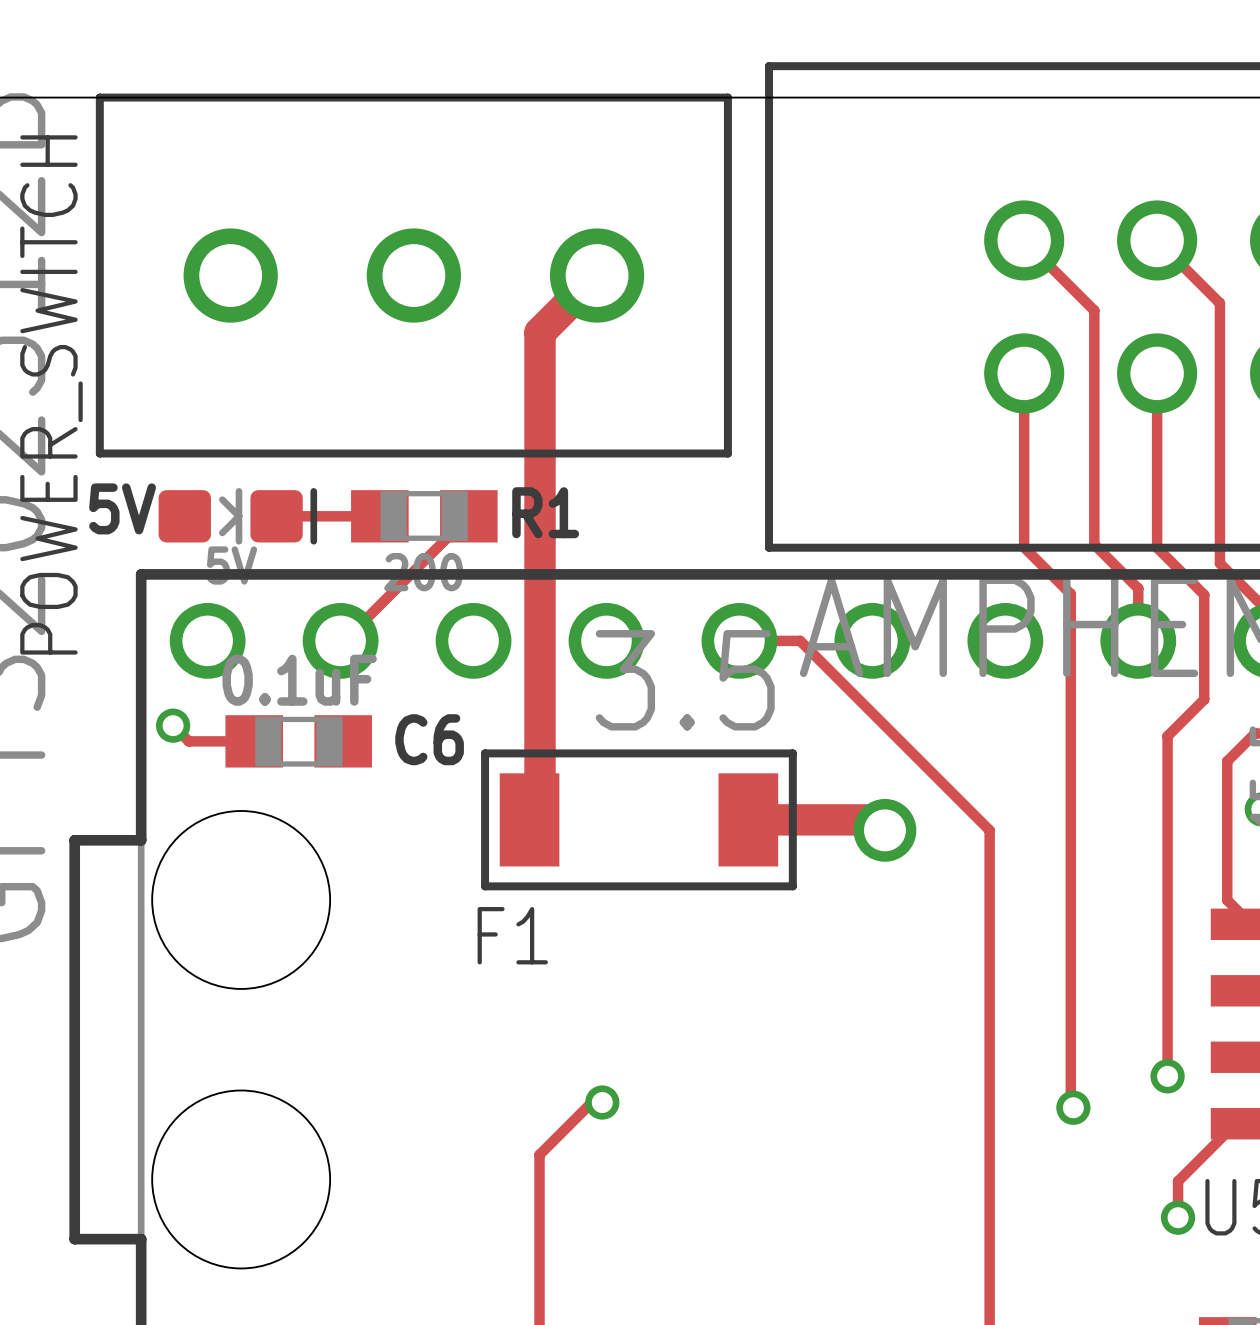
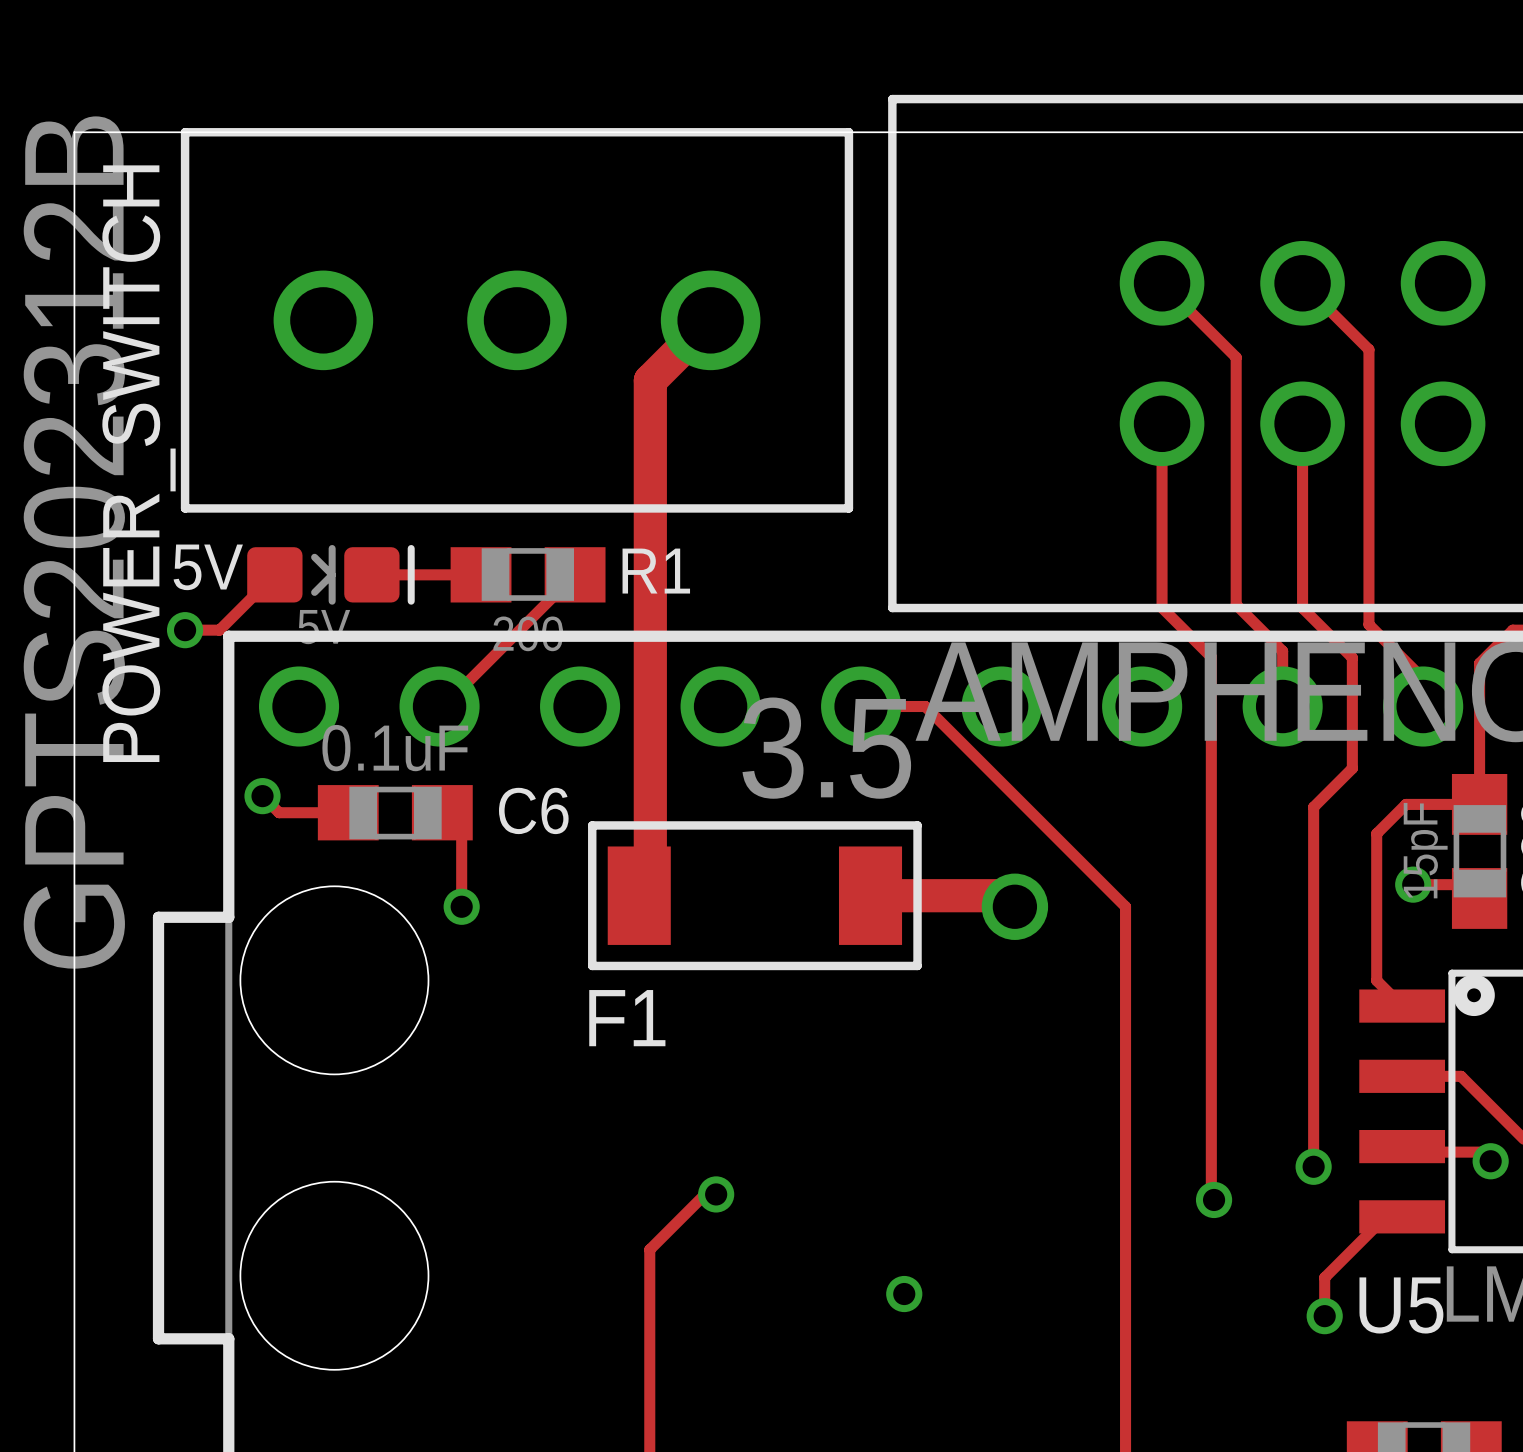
track: none -> (274, 574) (219, 630) (185, 630)
via: none -> (185, 630)
track: none -> (442, 812) (461, 832) (461, 906)
via: none -> (461, 906)
via: none -> (904, 1294)

